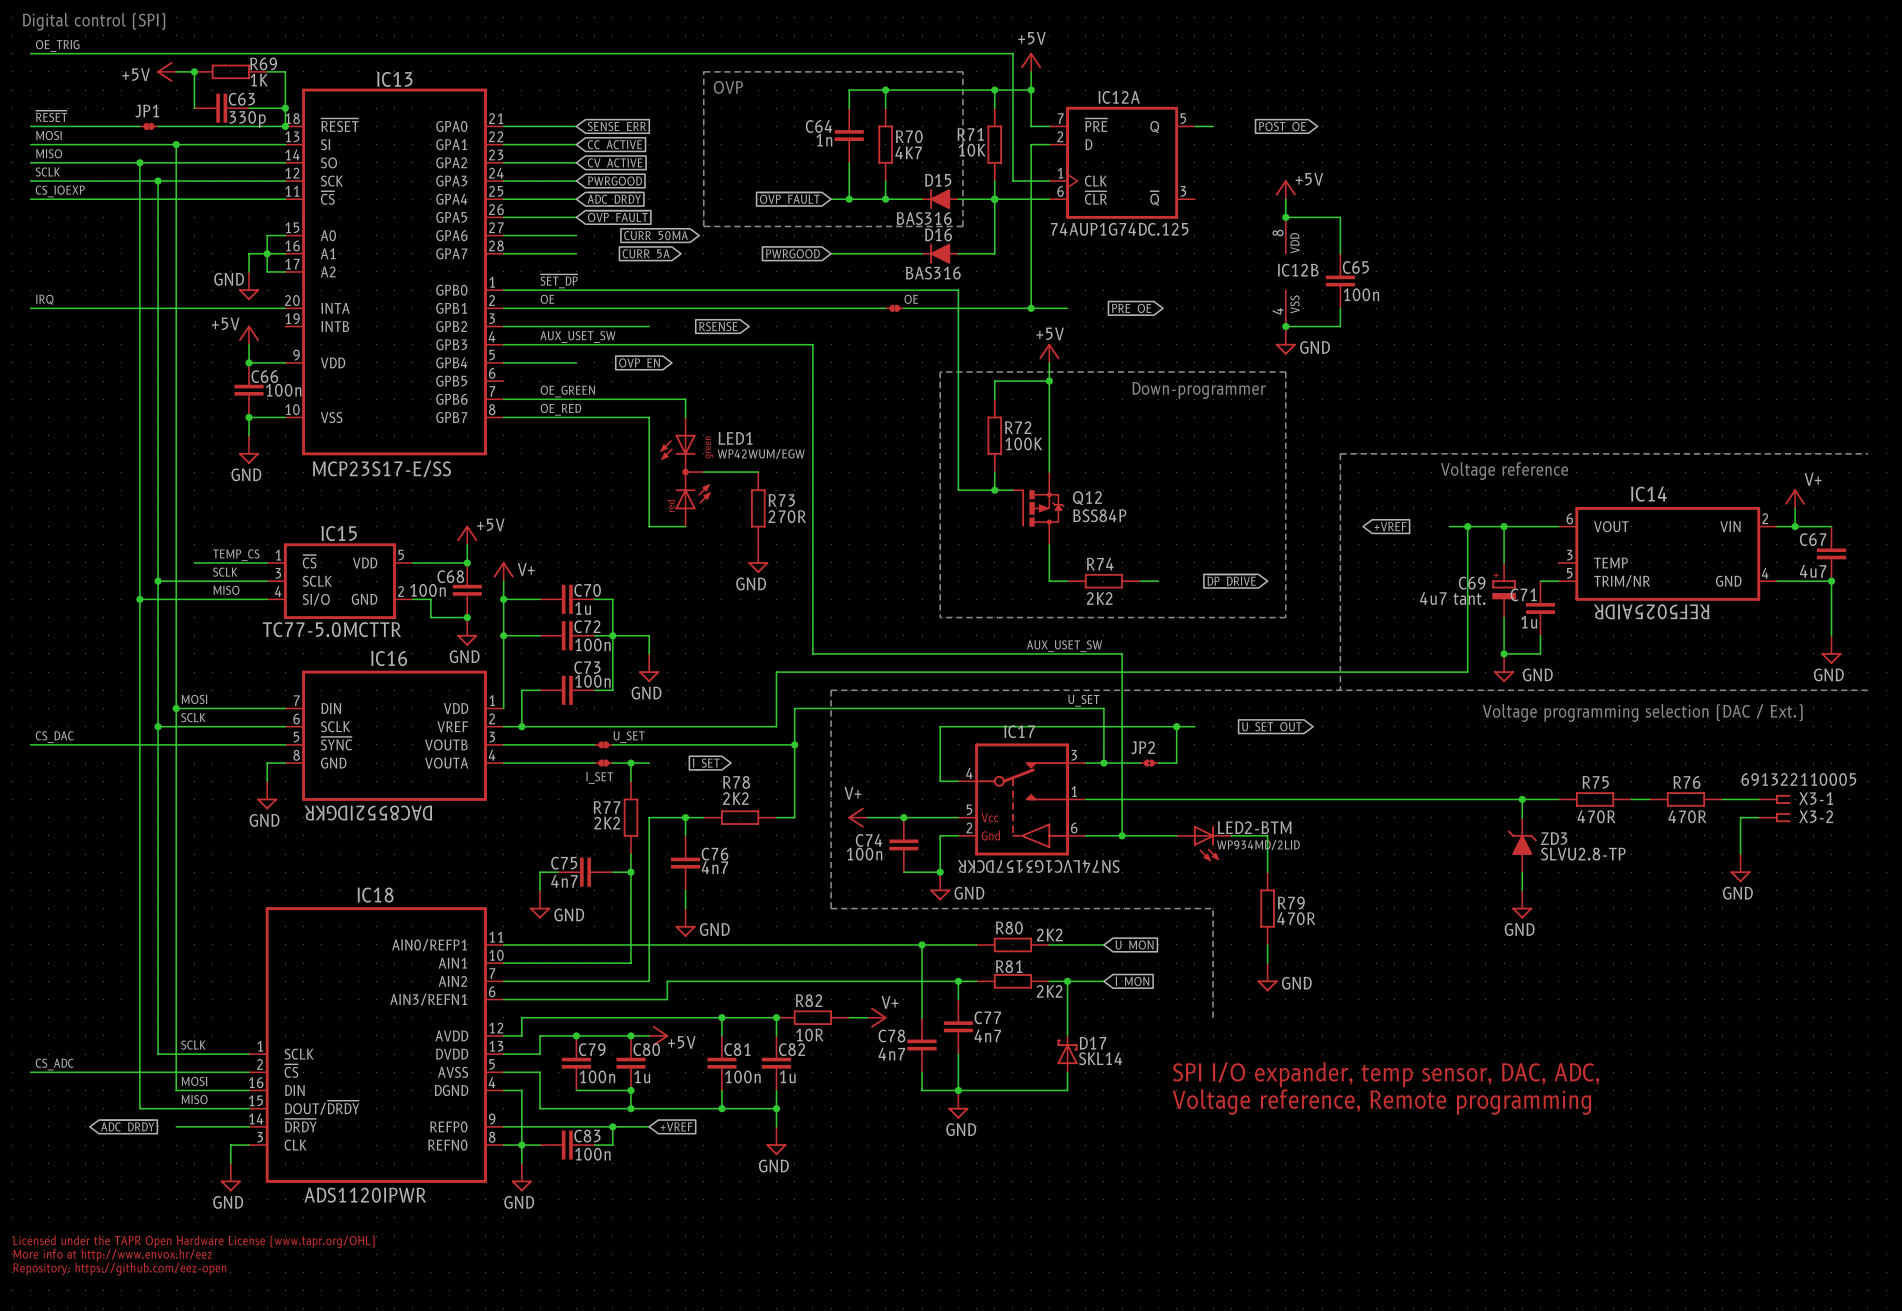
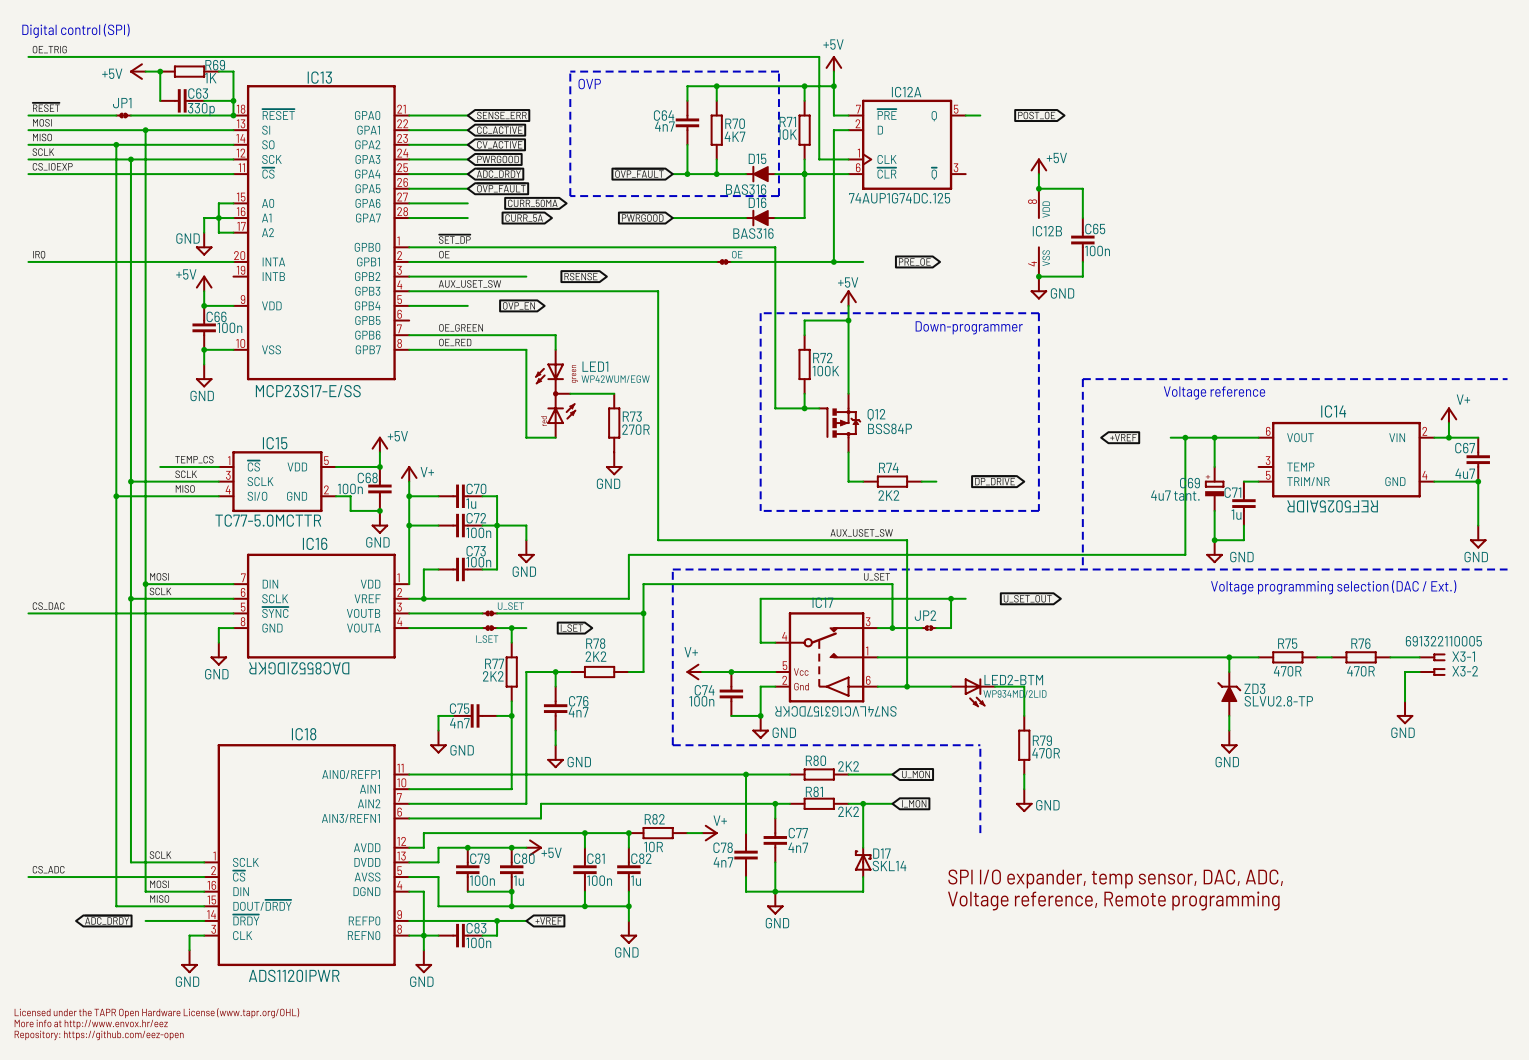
C64 value: 1n (824, 140) -> 4n7 (664, 126)

